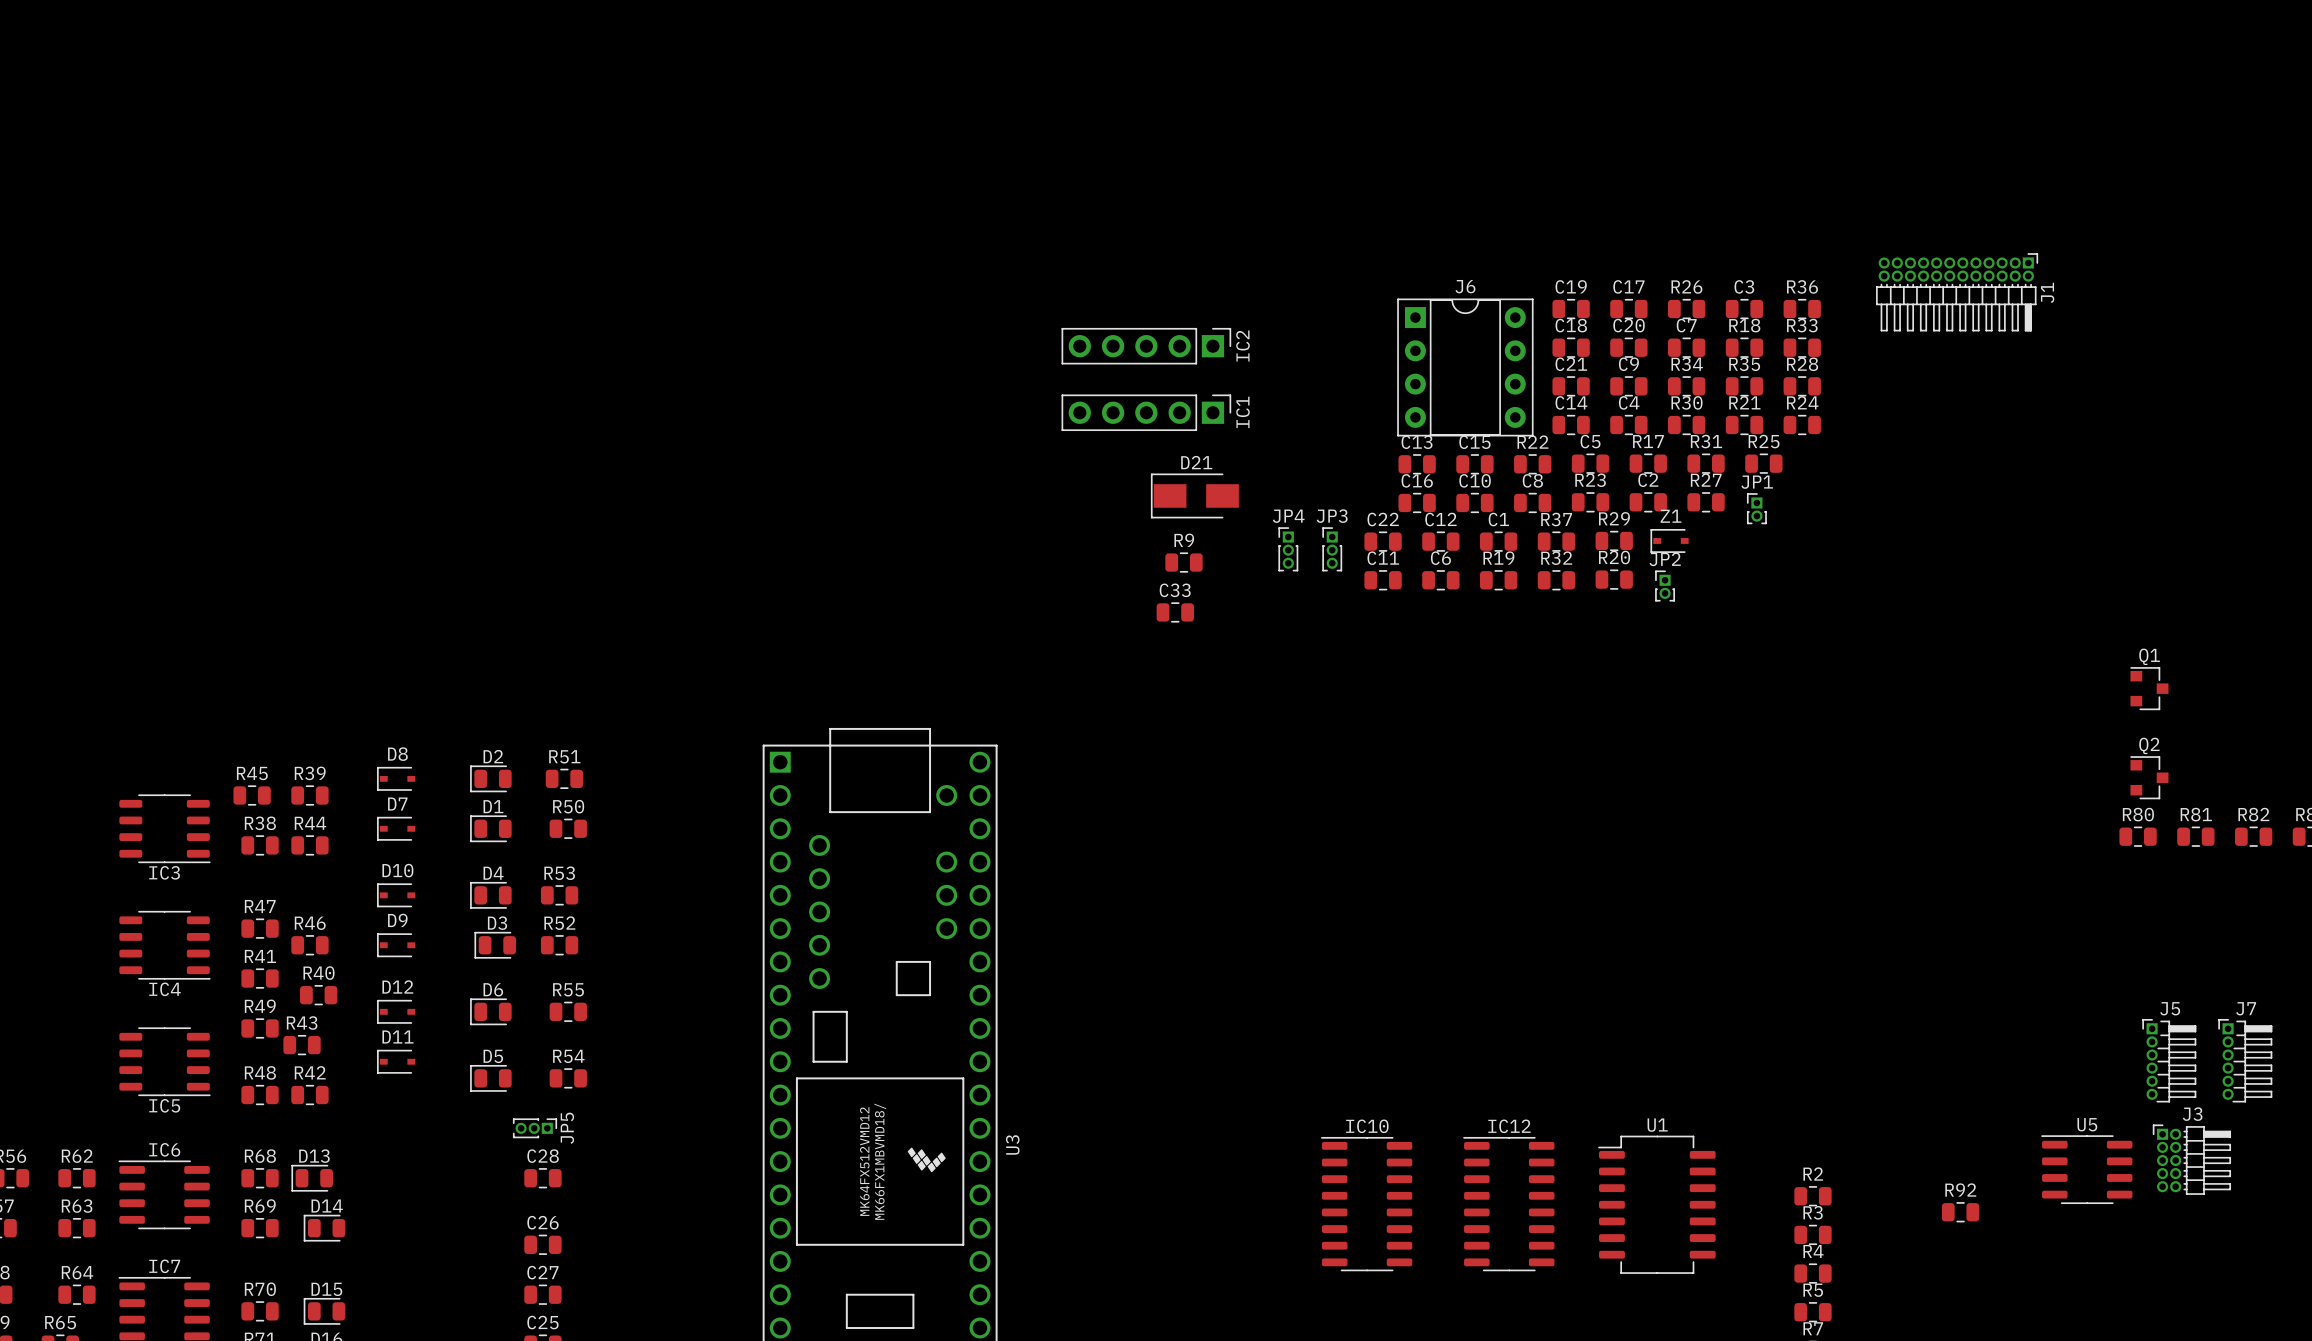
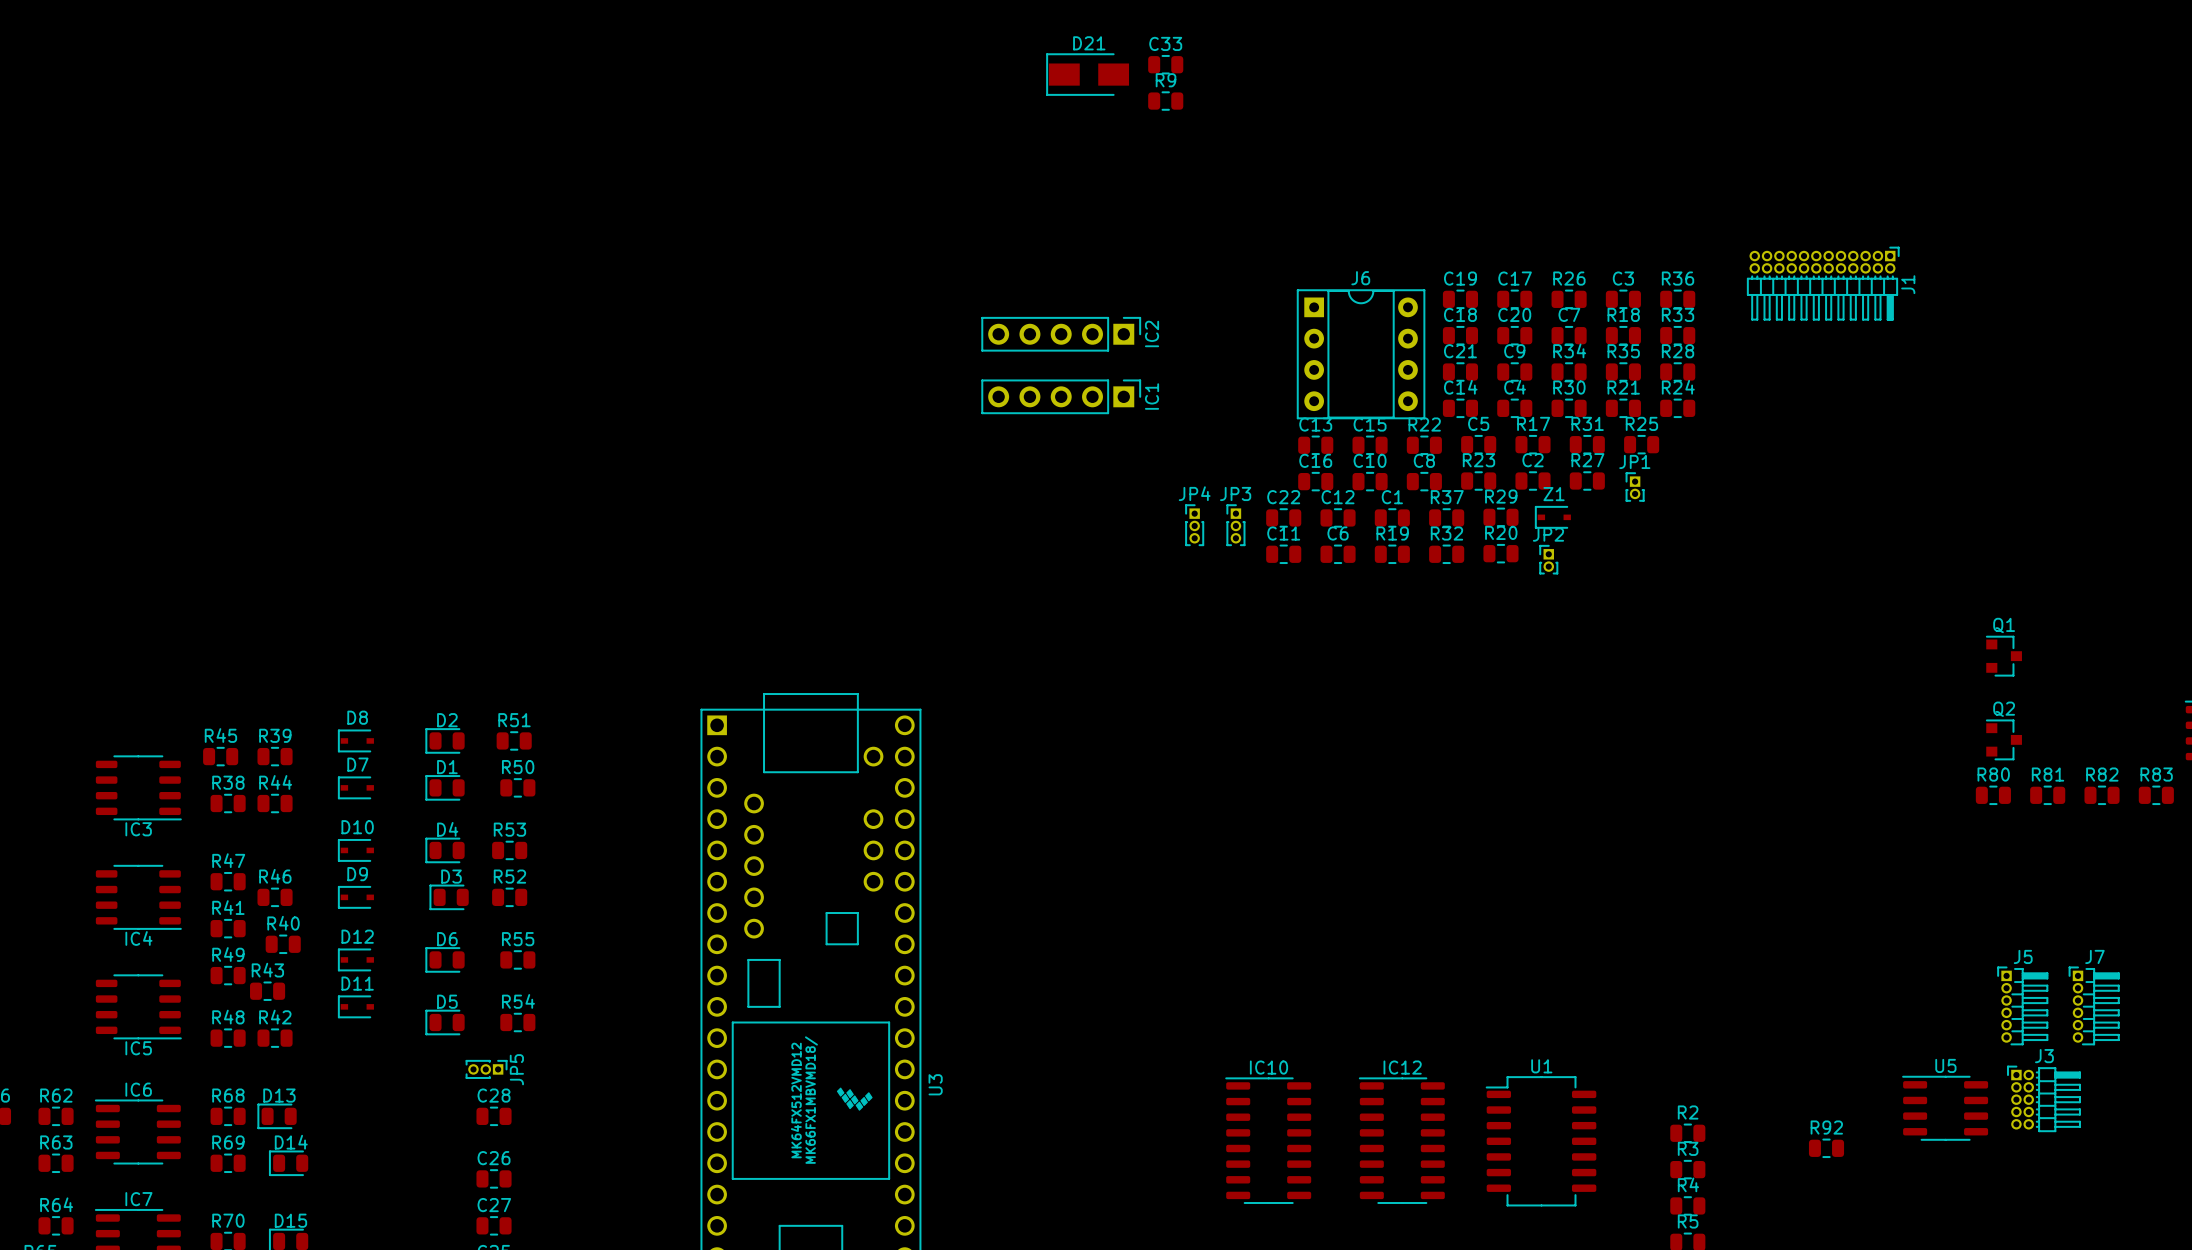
D21 position: (1194, 495) -> (1087, 74)
R9 position: (1184, 562) -> (1165, 101)
C33 position: (1175, 612) -> (1165, 64)

